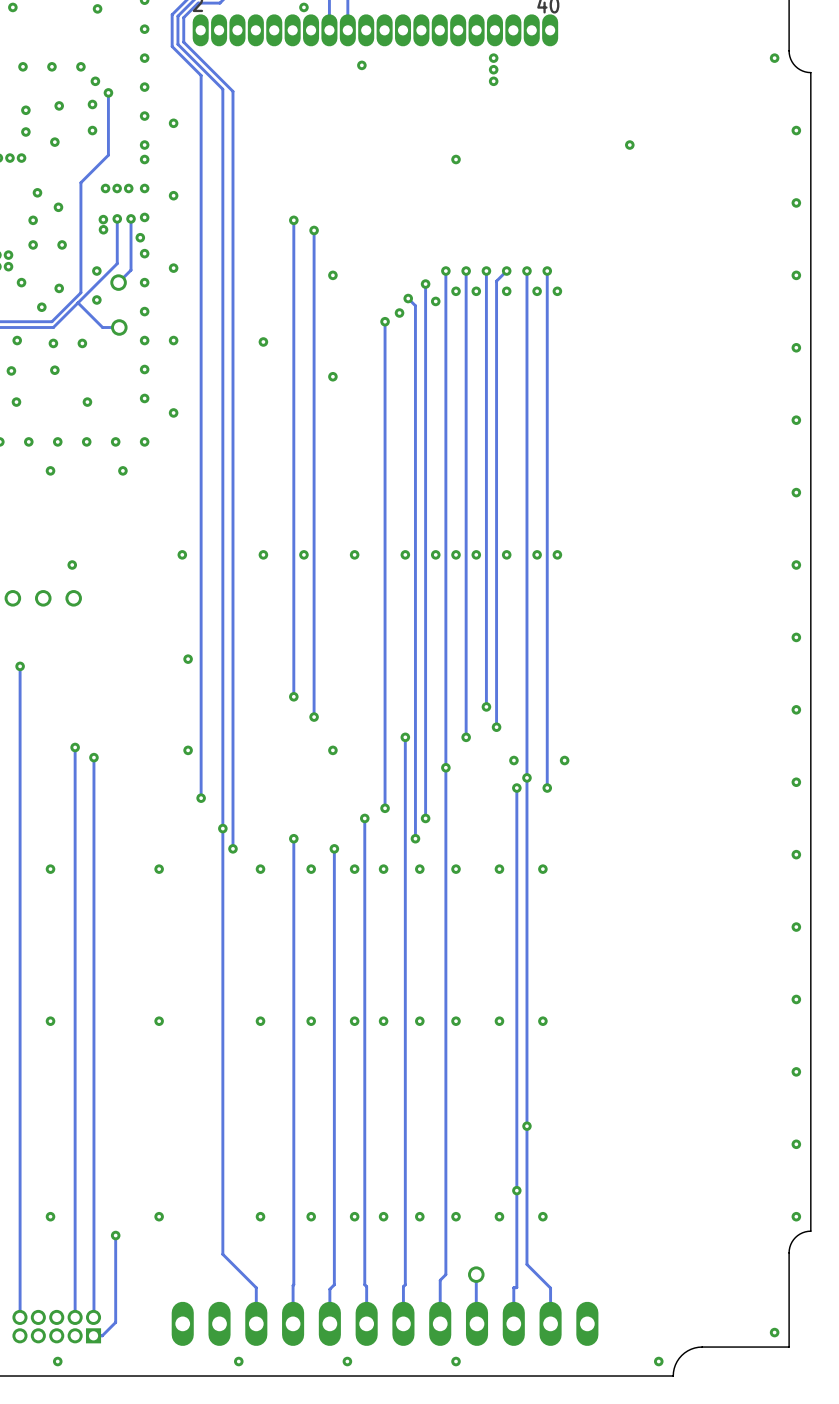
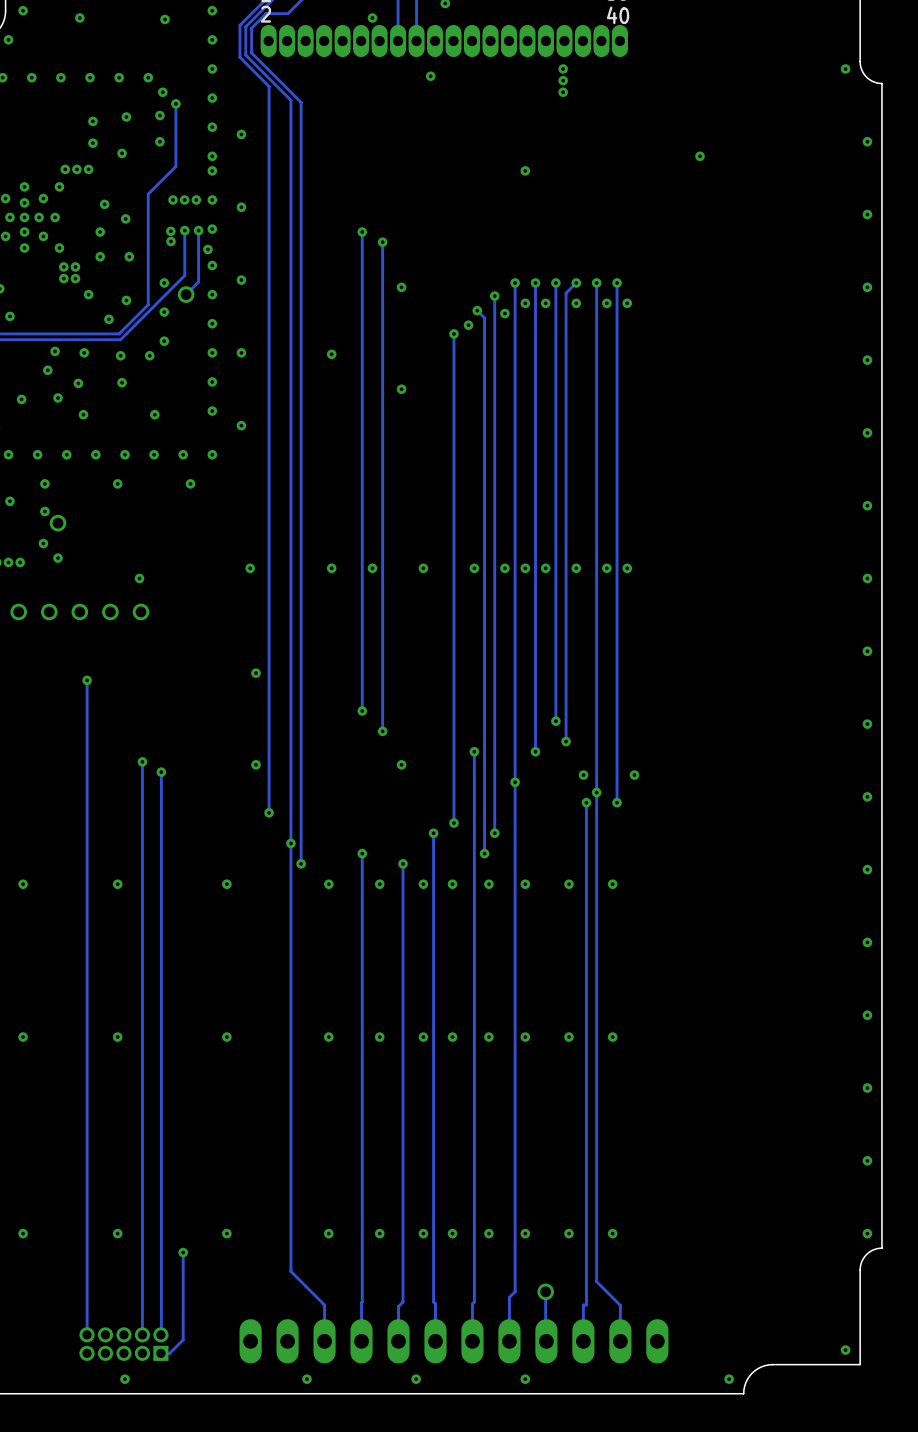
track: (78, 302) (102, 327) (119, 327) -> none
part: (119, 327) -> none
via: none -> (164, 341)
via: (526, 1126) -> none
via: (516, 1190) -> none

